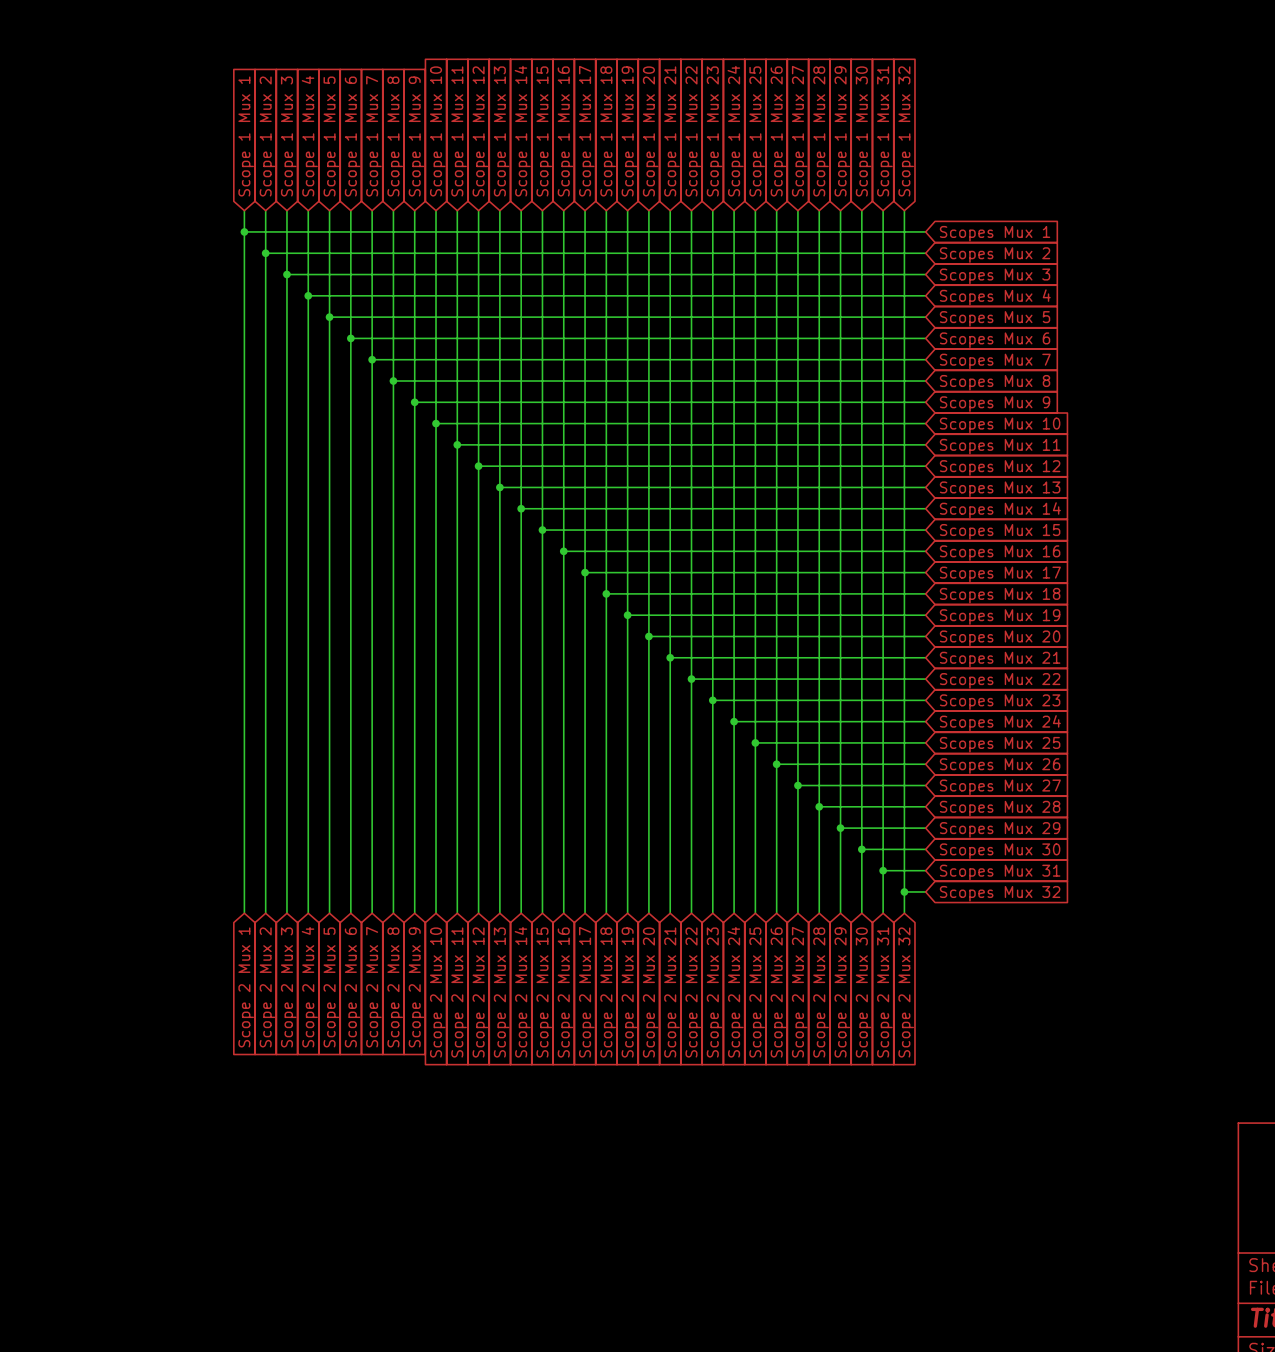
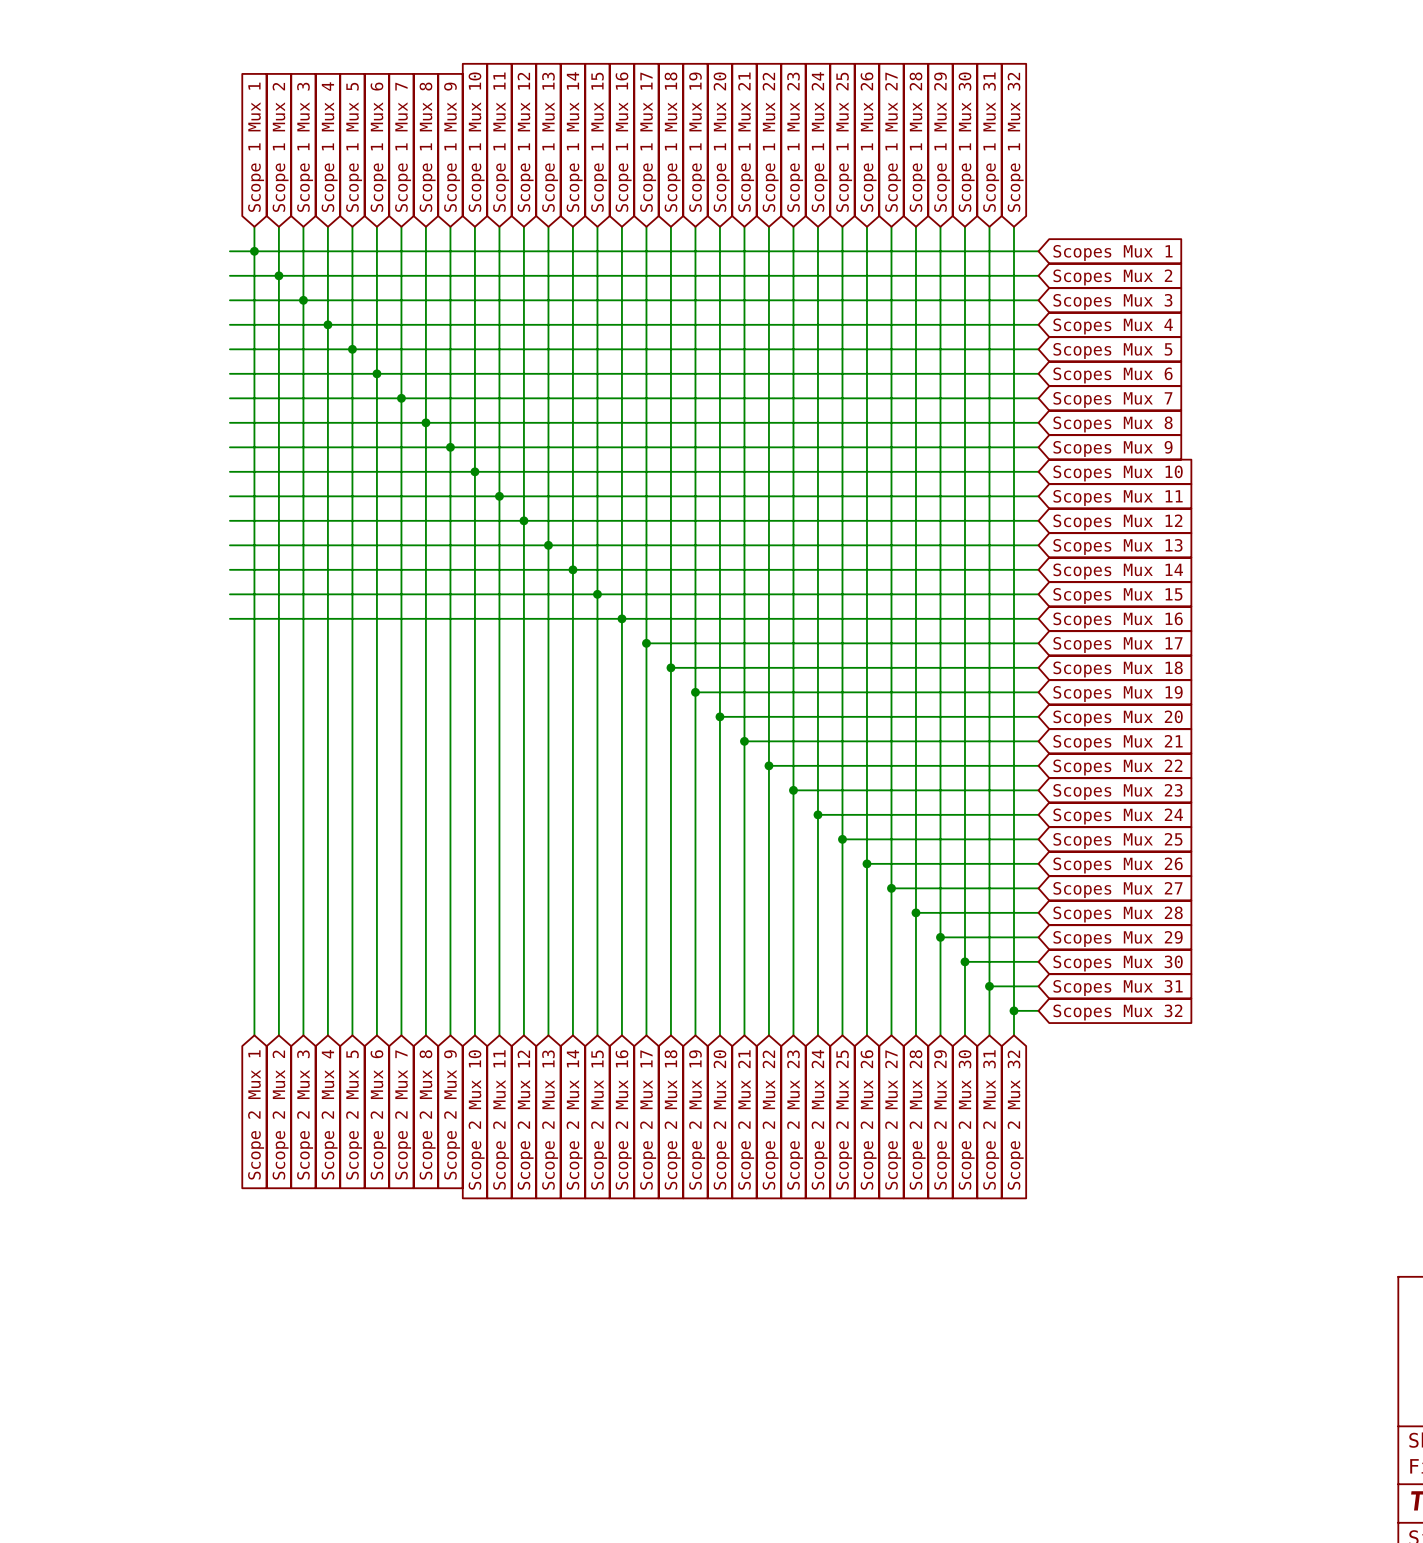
wire: none -> (229, 251) (254, 251)
wire: none -> (229, 275) (278, 275)
wire: none -> (229, 300) (303, 300)
wire: none -> (229, 324) (327, 324)
wire: none -> (229, 349) (352, 349)
wire: none -> (229, 373) (376, 373)
wire: none -> (229, 398) (401, 398)
wire: none -> (229, 422) (425, 422)
wire: none -> (229, 447) (450, 447)
wire: none -> (229, 471) (474, 471)
wire: none -> (229, 496) (499, 496)
wire: none -> (229, 520) (523, 520)
wire: none -> (229, 545) (548, 545)
wire: none -> (229, 569) (572, 569)
wire: none -> (229, 594) (597, 594)
wire: none -> (229, 618) (621, 618)

